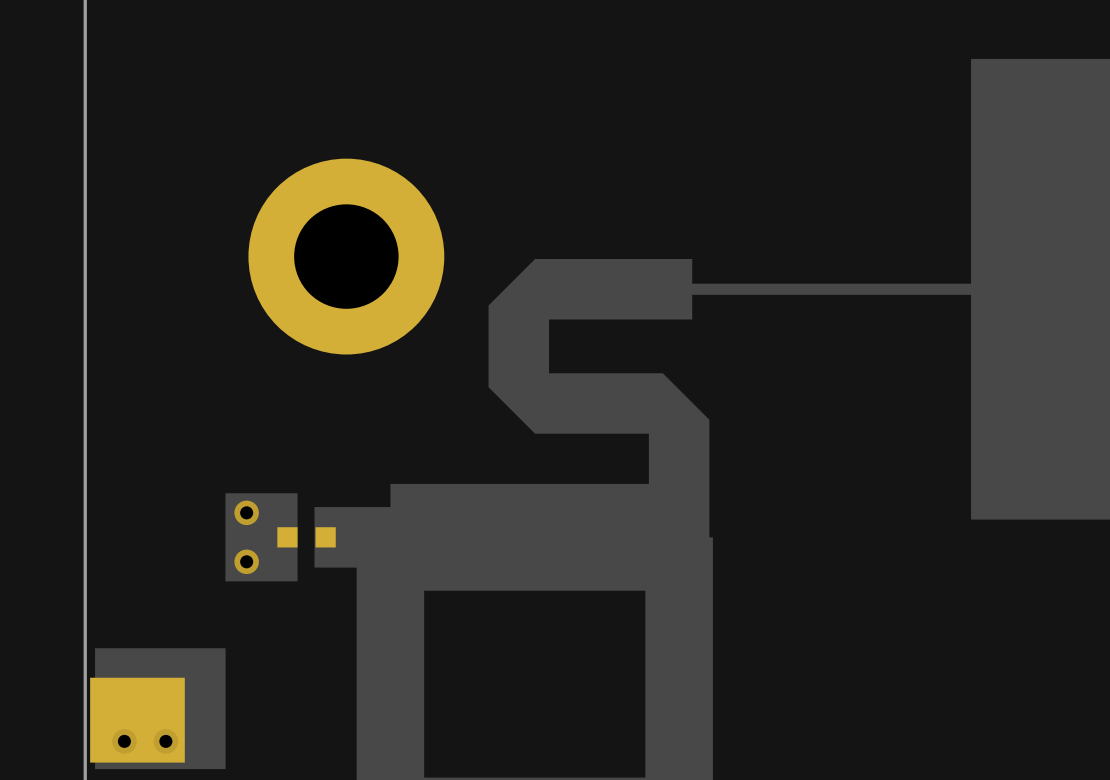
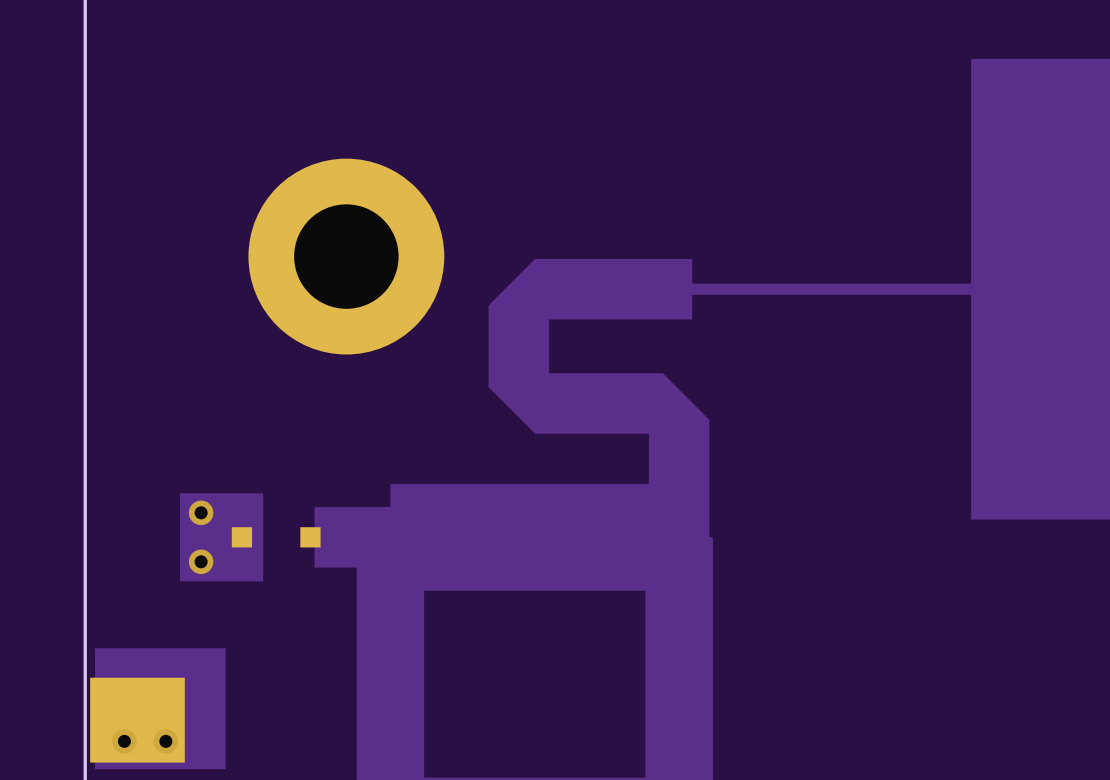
drawing: none -> [179, 493, 264, 582]
drawing: [225, 493, 298, 582] -> none
via: none -> (201, 512)
via: (246, 512) -> none
part footprint: [277, 527, 336, 548] -> [231, 527, 321, 548]
via: none -> (201, 561)
via: (246, 561) -> none

